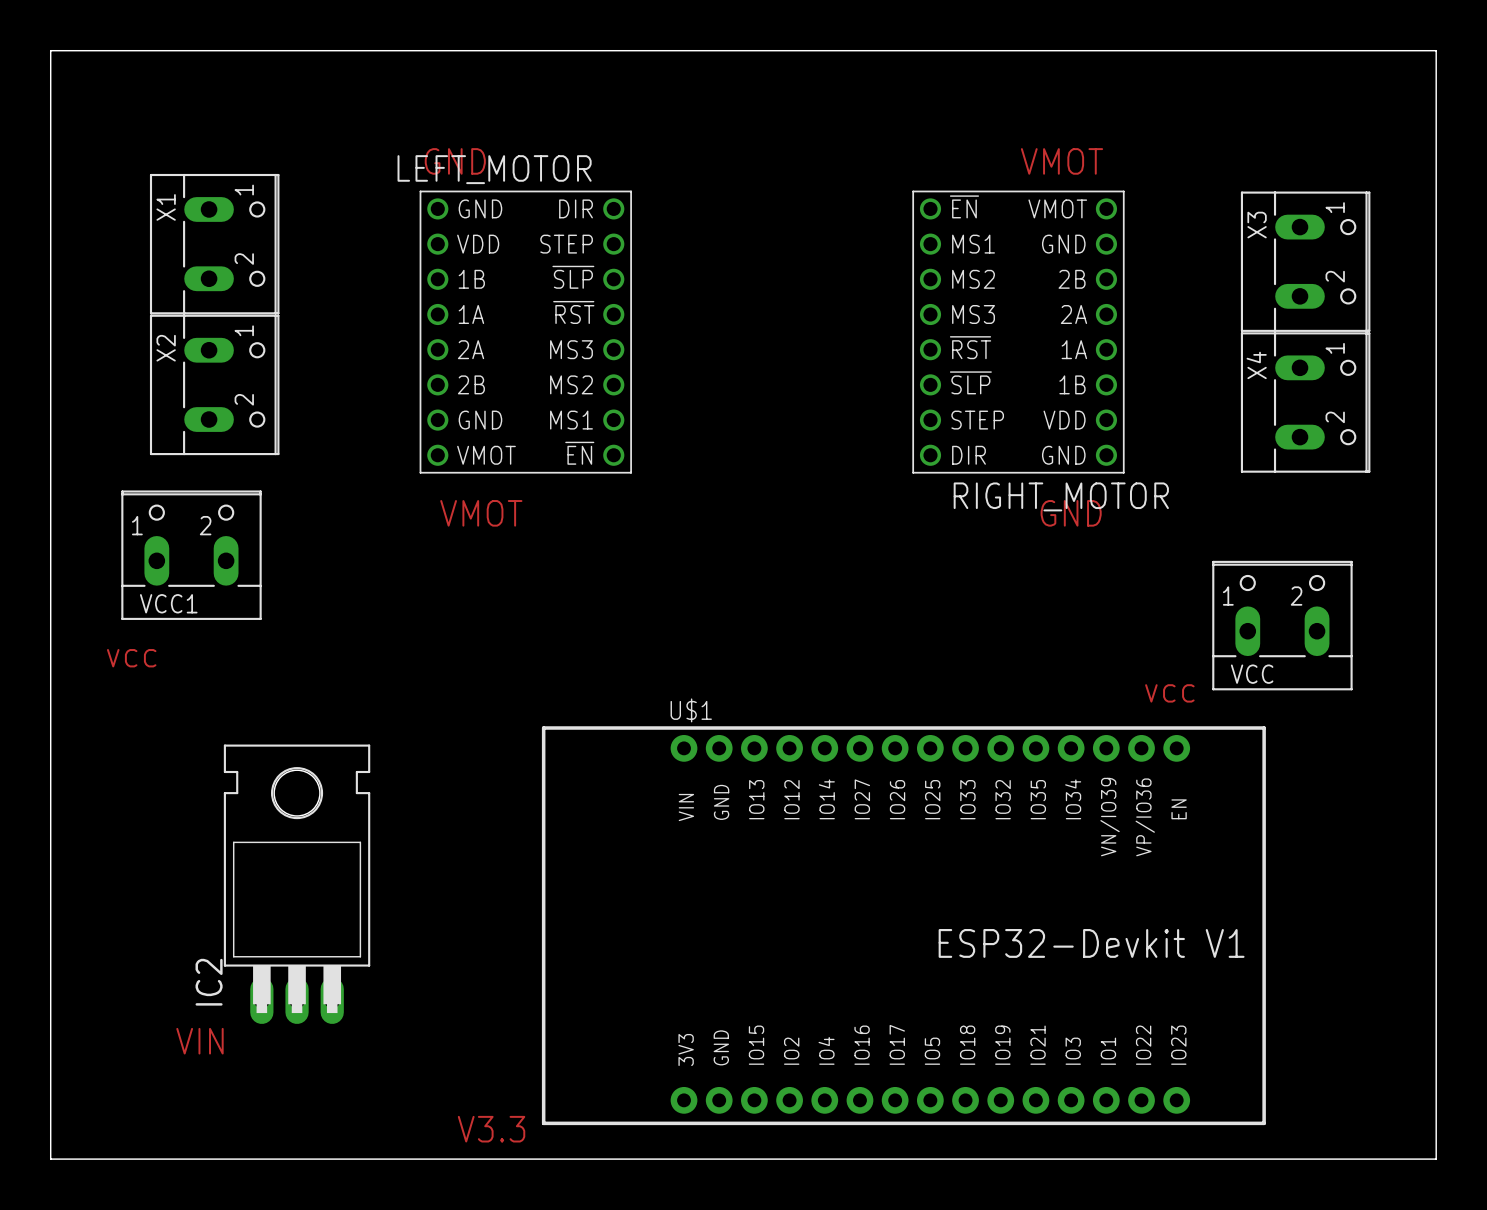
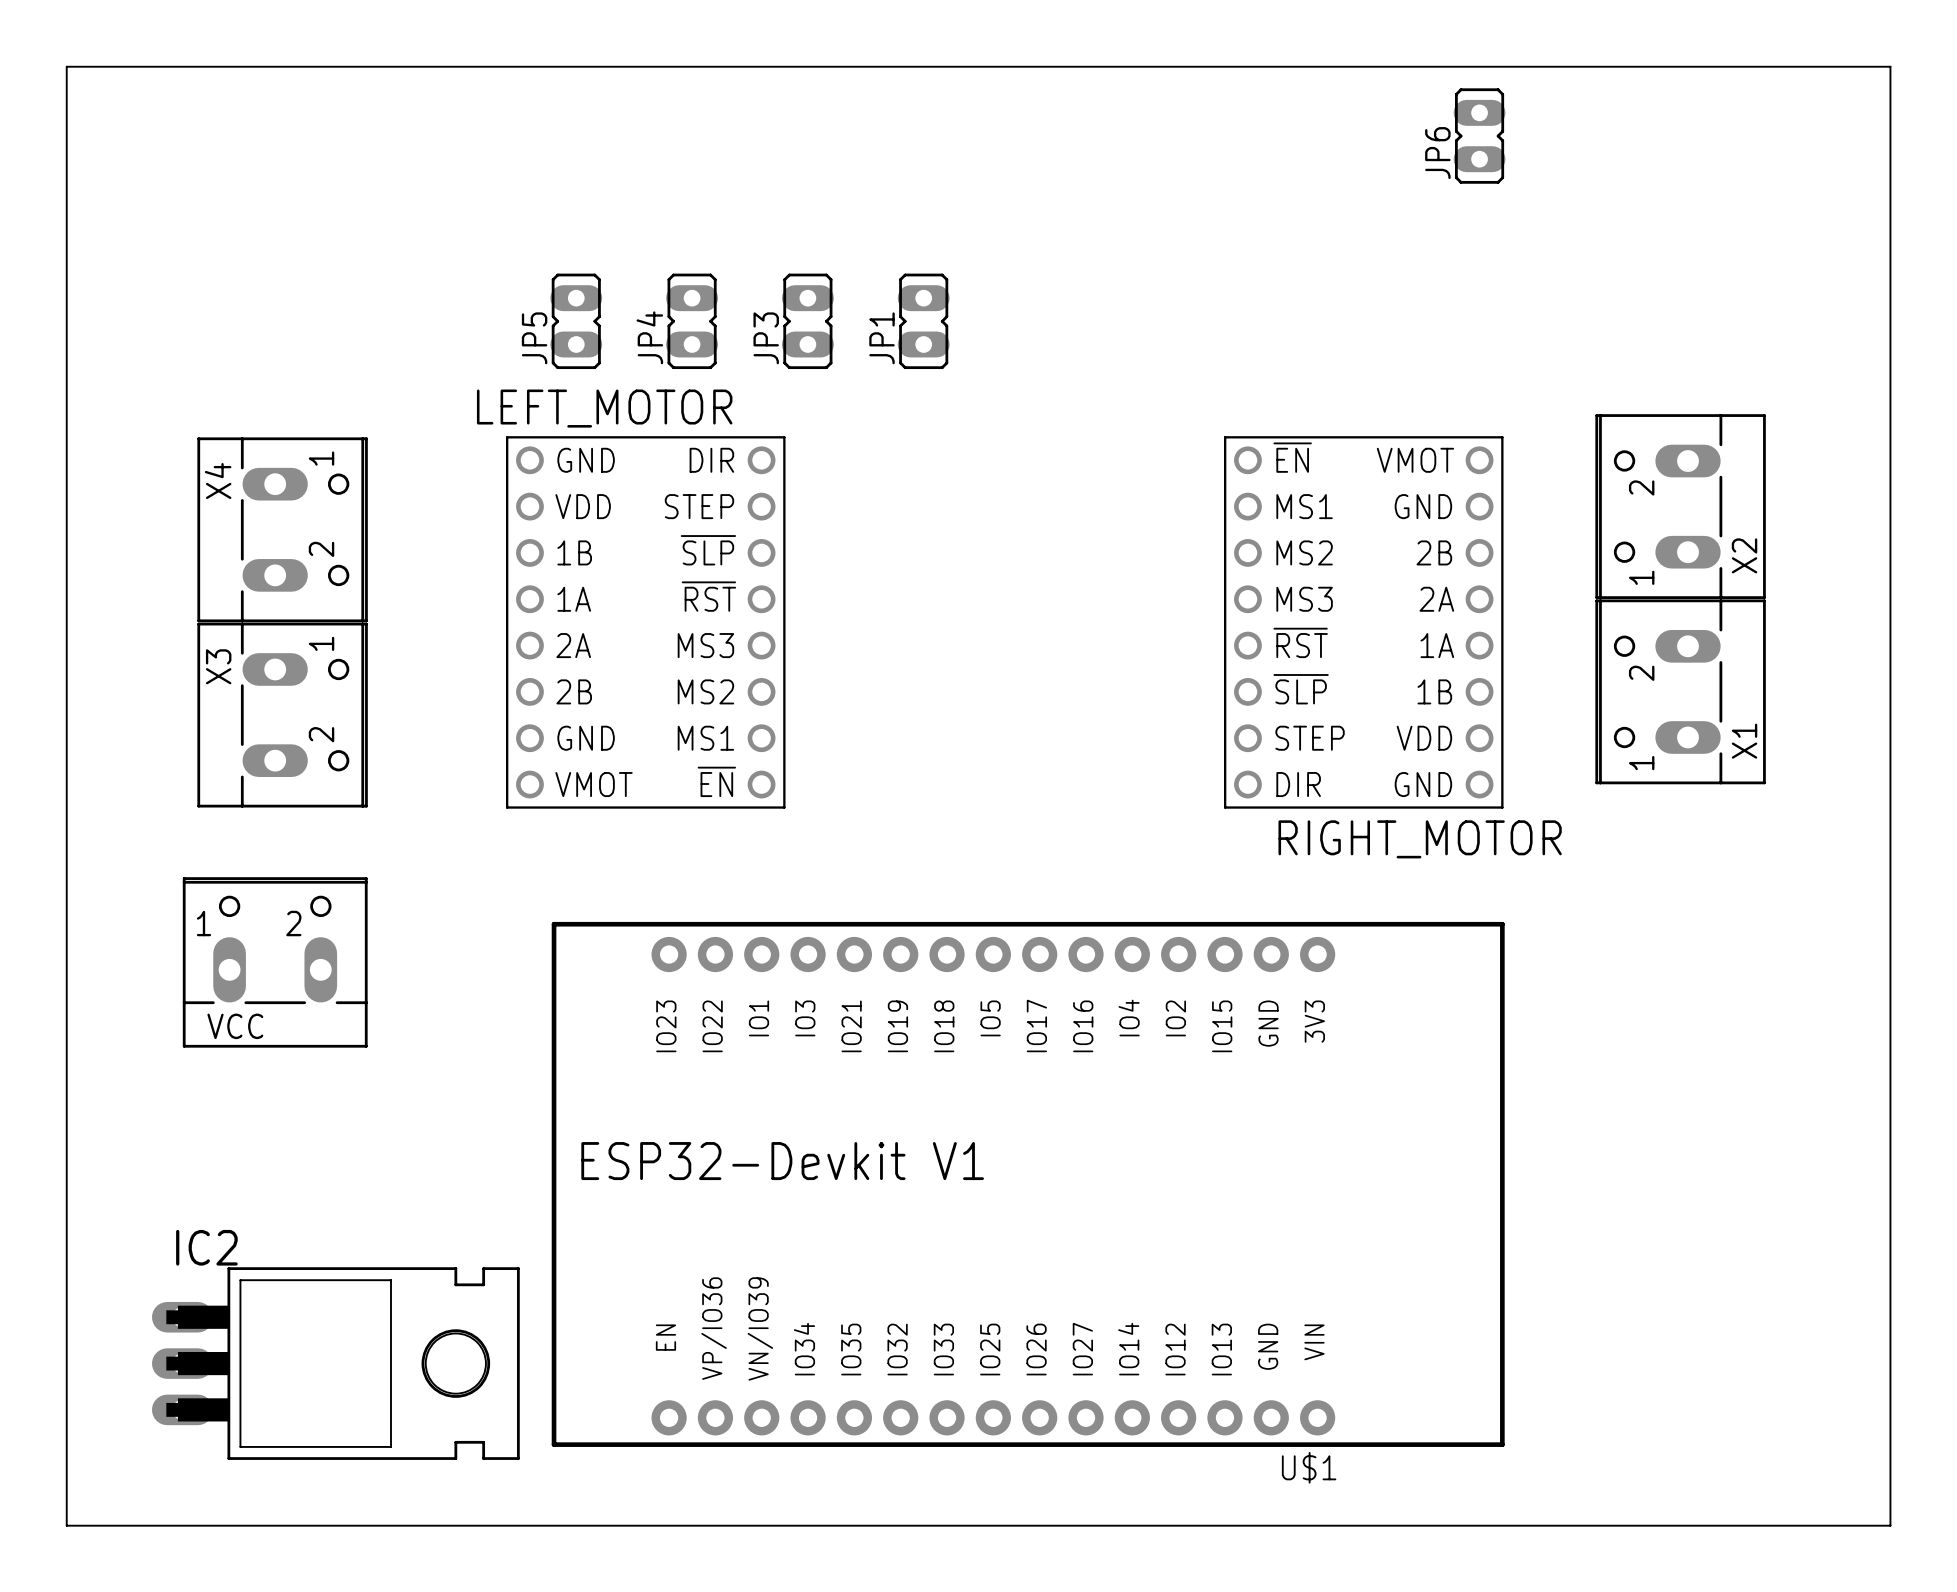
JP6: none -> (1479, 136)
text: GND (455, 161) -> none
text: VMOT (1062, 161) -> none
X1 footprint: [149, 173, 280, 315] -> [1595, 599, 1766, 785]
X1 name position: X1 (166, 207) -> X1 (1744, 741)
JP5: none -> (576, 321)
JP4: none -> (692, 321)
JP3: none -> (807, 321)
JP1: none -> (923, 321)
X3 position: (1305, 261) -> (282, 715)
X2 footprint: [149, 314, 280, 456] -> [1595, 414, 1766, 599]
LEFT_MOTOR position: (525, 332) -> (645, 622)
RIGHT_MOTOR position: (1018, 332) -> (1363, 622)
X2 name position: X2 (166, 348) -> X2 (1744, 555)
X4 position: (1305, 402) -> (282, 529)
text: VMOT (481, 513) -> none
text: GND (1071, 513) -> none
VCC1: (191, 555) -> none
VCC: (1282, 625) -> none
text: vcc (131, 658) -> none
text: vcc (1169, 693) -> none
U$1 name position: U$1 (691, 710) -> U$1 (1309, 1467)
U$1 footprint: [541, 726, 1266, 1126] -> [551, 921, 1505, 1447]
VCC: none -> (275, 962)
IC2 rotation: 0° (297, 884) -> 90° clockwise (335, 1363)
text: VIN (199, 1041) -> none
text: V3.3 (491, 1129) -> none

